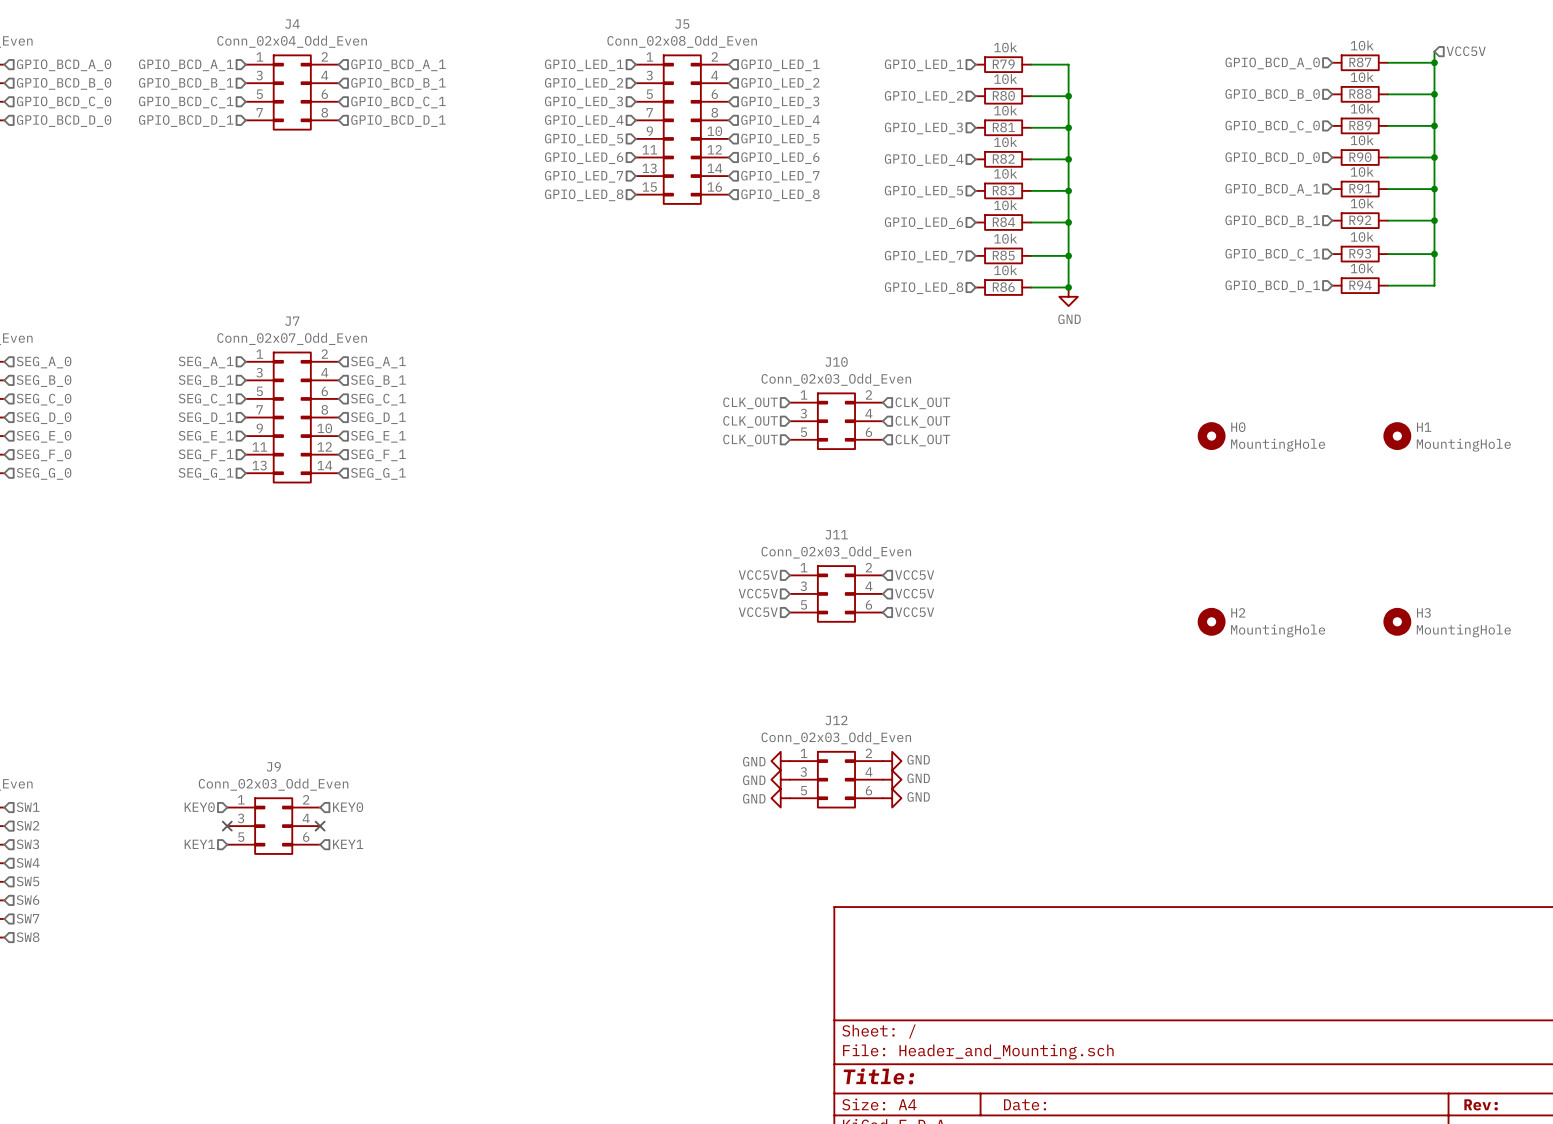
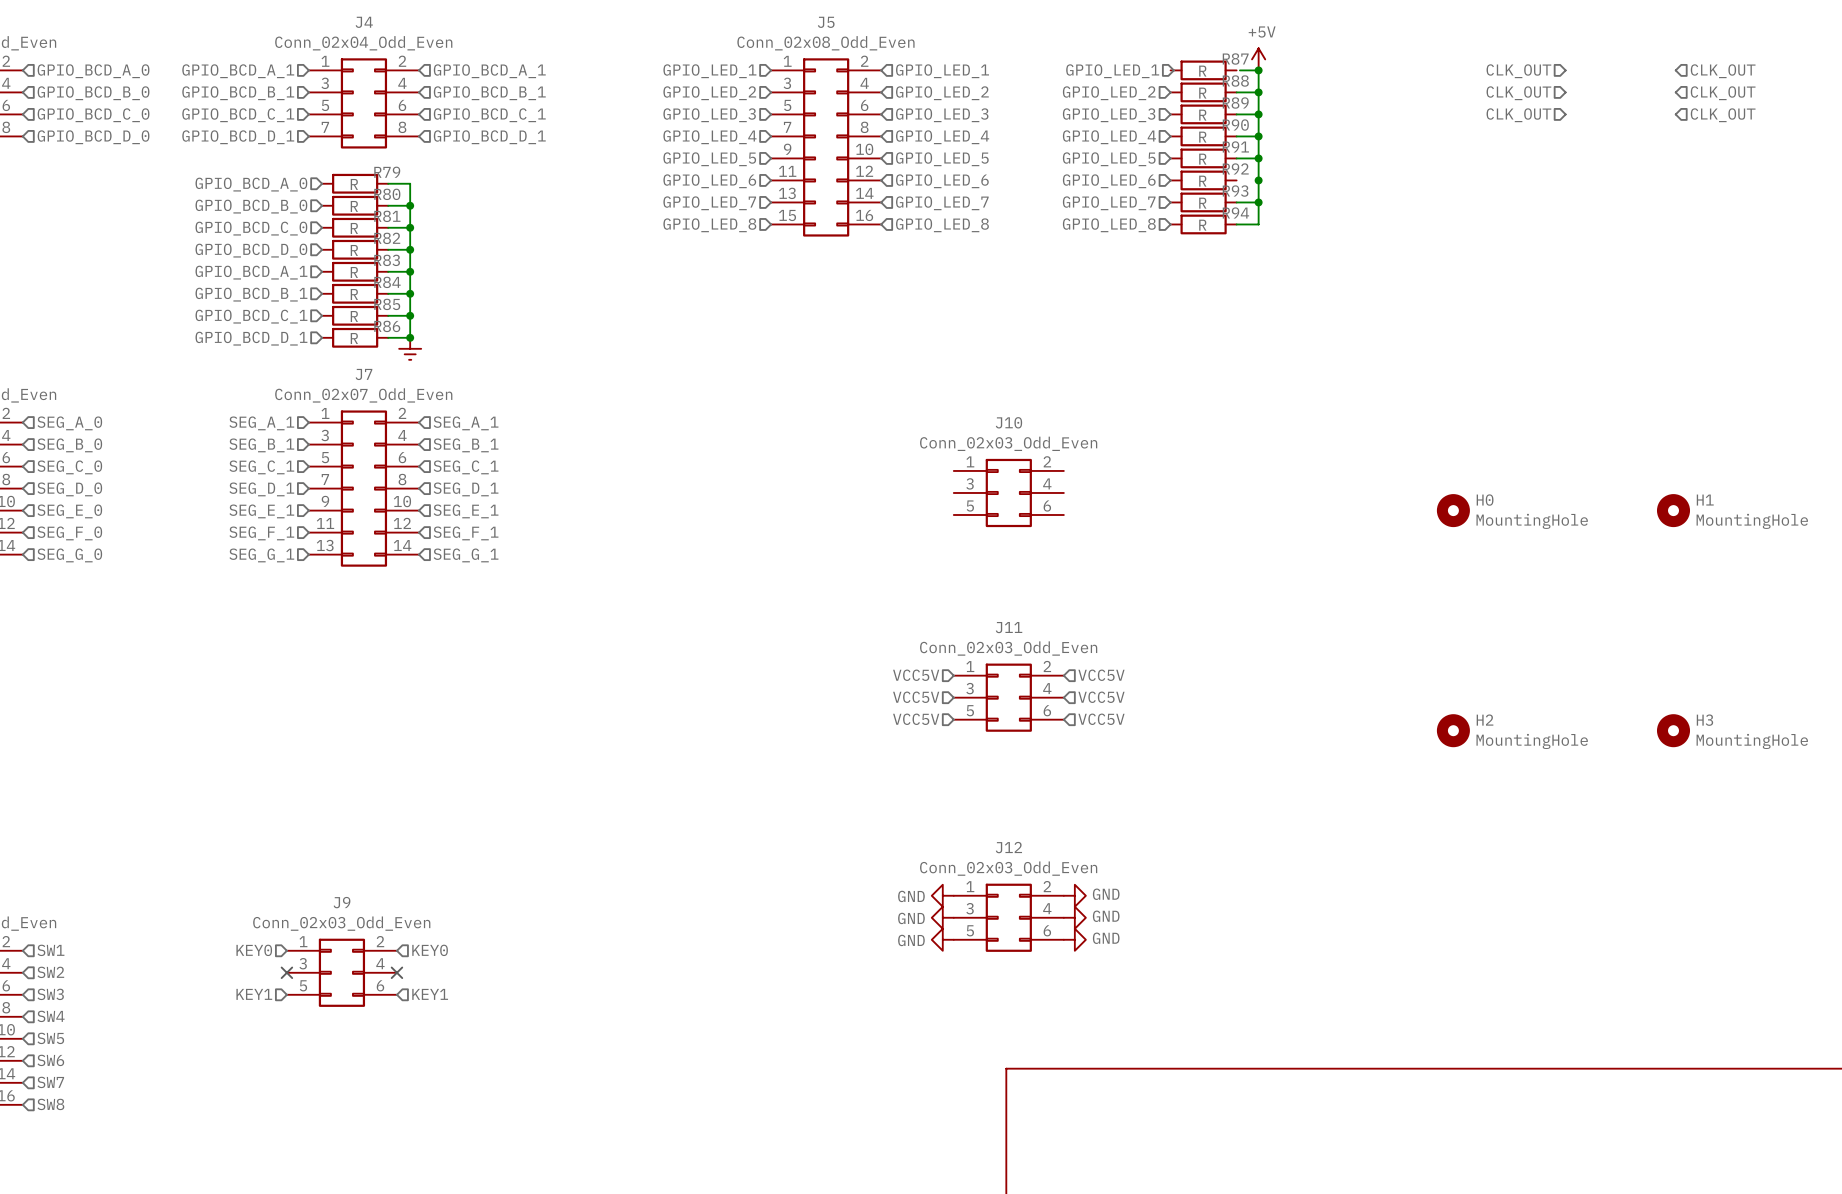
R87 value: 10k (1362, 45) -> R (1202, 71)
R79 value: 10k (1005, 47) -> R (354, 184)
wire: (1434, 51) (1434, 285) (1388, 285) -> none
hierarchical label: VCC5V (1466, 51) -> none
power symbol: none -> +5V (1258, 59)
R87 position: (1360, 62) -> (1203, 70)
R87 name position: R87 (1360, 62) -> R87 (1235, 58)
wire: (1388, 62) (1434, 62) -> none
junction: (1434, 62) -> none
hierarchical label: GPIO_BCD_A_0 (1272, 63) -> none
R79 position: (1003, 64) -> (355, 183)
R79 name position: R79 (1003, 64) -> R79 (387, 172)
wire: (1047, 64) (1068, 64) (1068, 287) (1031, 287) -> (1258, 70) (1258, 224) (1236, 224)
junction: none -> (1258, 70)
hierarchical label: none -> CLK_OUT (1518, 71)
hierarchical label: none -> CLK_OUT (1723, 71)
R88 value: 10k (1362, 77) -> R (1202, 93)
R80 value: 10k (1005, 78) -> R (354, 206)
wire: none -> (1236, 92) (1258, 92)
junction: none -> (1258, 92)
hierarchical label: none -> CLK_OUT (1518, 93)
hierarchical label: none -> CLK_OUT (1723, 93)
R88 position: (1360, 94) -> (1203, 92)
R88 name position: R88 (1360, 94) -> R88 (1235, 81)
wire: (1388, 94) (1434, 94) -> none
junction: (1434, 94) -> none
R80 name position: R80 (1003, 95) -> R80 (387, 194)
hierarchical label: GPIO_BCD_B_0 (1272, 95) -> none
hierarchical label position: GPIO_LED_2 (923, 96) -> GPIO_LED_2 (1109, 93)
R80 position: (1003, 96) -> (355, 205)
wire: (1031, 96) (1068, 96) -> none
junction: (1068, 96) -> none
wire: none -> (1236, 114) (1258, 114)
junction: none -> (1258, 114)
hierarchical label: none -> CLK_OUT (1518, 115)
hierarchical label: none -> CLK_OUT (1723, 115)
R89 value: 10k (1362, 108) -> R (1202, 115)
R81 value: 10k (1005, 110) -> R (354, 228)
wire: none -> (1236, 136) (1258, 136)
junction: none -> (1258, 136)
R89 position: (1360, 125) -> (1203, 114)
R89 name position: R89 (1360, 125) -> R89 (1235, 103)
wire: (1388, 125) (1434, 125) -> none
junction: (1434, 125) -> none
hierarchical label: GPIO_BCD_C_0 (1272, 126) -> none
R81 position: (1003, 127) -> (355, 227)
R81 name position: R81 (1003, 127) -> R81 (387, 216)
wire: (1031, 127) (1068, 127) -> none
junction: (1068, 127) -> none
hierarchical label position: GPIO_LED_3 (923, 128) -> GPIO_LED_3 (1109, 115)
wire: none -> (1236, 158) (1258, 158)
junction: none -> (1258, 158)
R90 value: 10k (1362, 140) -> R (1202, 137)
R82 value: 10k (1005, 142) -> R (354, 250)
junction: none -> (1258, 180)
R90 position: (1360, 157) -> (1203, 136)
R90 name position: R90 (1360, 157) -> R90 (1235, 125)
wire: (1388, 157) (1434, 157) -> none
junction: (1434, 157) -> none
hierarchical label: GPIO_BCD_D_0 (1272, 158) -> none
R82 position: (1003, 159) -> (355, 249)
R82 name position: R82 (1003, 159) -> R82 (387, 238)
wire: (1031, 159) (1068, 159) -> none
junction: (1068, 159) -> none
hierarchical label: none -> GPIO_BCD_A_0 (251, 184)
wire: none -> (388, 183) (410, 183) (410, 337) (388, 337)
hierarchical label position: GPIO_LED_4 (924, 160) -> GPIO_LED_4 (1109, 137)
R91 value: 10k (1362, 171) -> R (1202, 159)
R83 value: 10k (1005, 173) -> R (354, 272)
wire: none -> (1236, 202) (1258, 202)
junction: none -> (1258, 202)
wire: none -> (388, 205) (410, 205)
junction: none -> (410, 205)
hierarchical label: none -> GPIO_BCD_B_0 (251, 206)
R91 name position: R91 (1360, 188) -> R91 (1235, 146)
hierarchical label: GPIO_BCD_A_1 (1272, 189) -> none
R91 position: (1360, 189) -> (1203, 158)
wire: (1388, 189) (1434, 189) -> none
junction: (1434, 189) -> none
R83 position: (1003, 190) -> (355, 271)
R83 name position: R83 (1003, 190) -> R83 (387, 260)
wire: (1031, 190) (1068, 190) -> none
junction: (1068, 190) -> none
hierarchical label position: GPIO_LED_5 (923, 191) -> GPIO_LED_5 (1109, 159)
wire: none -> (388, 227) (410, 227)
junction: none -> (410, 227)
hierarchical label: none -> GPIO_BCD_C_0 (251, 228)
R92 value: 10k (1362, 203) -> R (1202, 181)
R84 value: 10k (1005, 205) -> R (354, 294)
hierarchical label: none -> GPIO_BCD_D_0 (251, 250)
wire: none -> (388, 249) (410, 249)
junction: none -> (410, 249)
R92 position: (1360, 220) -> (1203, 180)
R92 name position: R92 (1360, 220) -> R92 (1235, 168)
wire: (1388, 220) (1434, 220) -> none
junction: (1434, 220) -> none
hierarchical label: GPIO_BCD_B_1 (1272, 221) -> none
R84 position: (1003, 222) -> (355, 293)
R84 name position: R84 (1003, 222) -> R84 (387, 282)
wire: (1031, 222) (1068, 222) -> none
junction: (1068, 222) -> none
hierarchical label position: GPIO_LED_6 (923, 223) -> GPIO_LED_6 (1109, 181)
wire: none -> (388, 271) (410, 271)
junction: none -> (410, 271)
hierarchical label: none -> GPIO_BCD_A_1 (251, 272)
R93 value: 10k (1362, 236) -> R (1202, 203)
R85 value: 10k (1005, 238) -> R (354, 316)
hierarchical label: none -> GPIO_BCD_B_1 (251, 294)
wire: none -> (388, 293) (410, 293)
junction: none -> (410, 293)
R93 name position: R93 (1360, 253) -> R93 (1235, 191)
hierarchical label: GPIO_BCD_C_1 (1272, 254) -> none
R93 position: (1360, 254) -> (1203, 202)
wire: (1388, 254) (1434, 254) -> none
junction: (1434, 254) -> none
R85 position: (1003, 255) -> (355, 315)
R85 name position: R85 (1003, 255) -> R85 (387, 304)
wire: (1031, 255) (1068, 255) -> none
junction: (1068, 255) -> none
hierarchical label position: GPIO_LED_7 (923, 256) -> GPIO_LED_7 (1109, 203)
R94 value: 10k (1362, 268) -> R (1202, 225)
R86 value: 10k (1005, 270) -> R (354, 338)
wire: none -> (388, 315) (410, 315)
junction: none -> (410, 315)
hierarchical label: none -> GPIO_BCD_C_1 (251, 316)
R94 position: (1360, 285) -> (1203, 224)
R94 name position: R94 (1360, 285) -> R94 (1235, 212)
hierarchical label: GPIO_BCD_D_1 (1272, 286) -> none
R86 position: (1003, 287) -> (355, 337)
R86 name position: R86 (1003, 287) -> R86 (387, 326)
junction: (1068, 287) -> none
hierarchical label position: GPIO_LED_8 (924, 288) -> GPIO_LED_8 (1109, 225)
hierarchical label: none -> GPIO_BCD_D_1 (251, 338)
junction: none -> (410, 337)
power symbol: GND (1068, 296) -> none
power symbol: none -> (410, 348)
hierarchical label: CLK_OUT (750, 403) -> none
hierarchical label: CLK_OUT (922, 403) -> none
hierarchical label: CLK_OUT (750, 421) -> none
hierarchical label: CLK_OUT (922, 421) -> none
hierarchical label: CLK_OUT (750, 440) -> none
hierarchical label: CLK_OUT (922, 440) -> none

